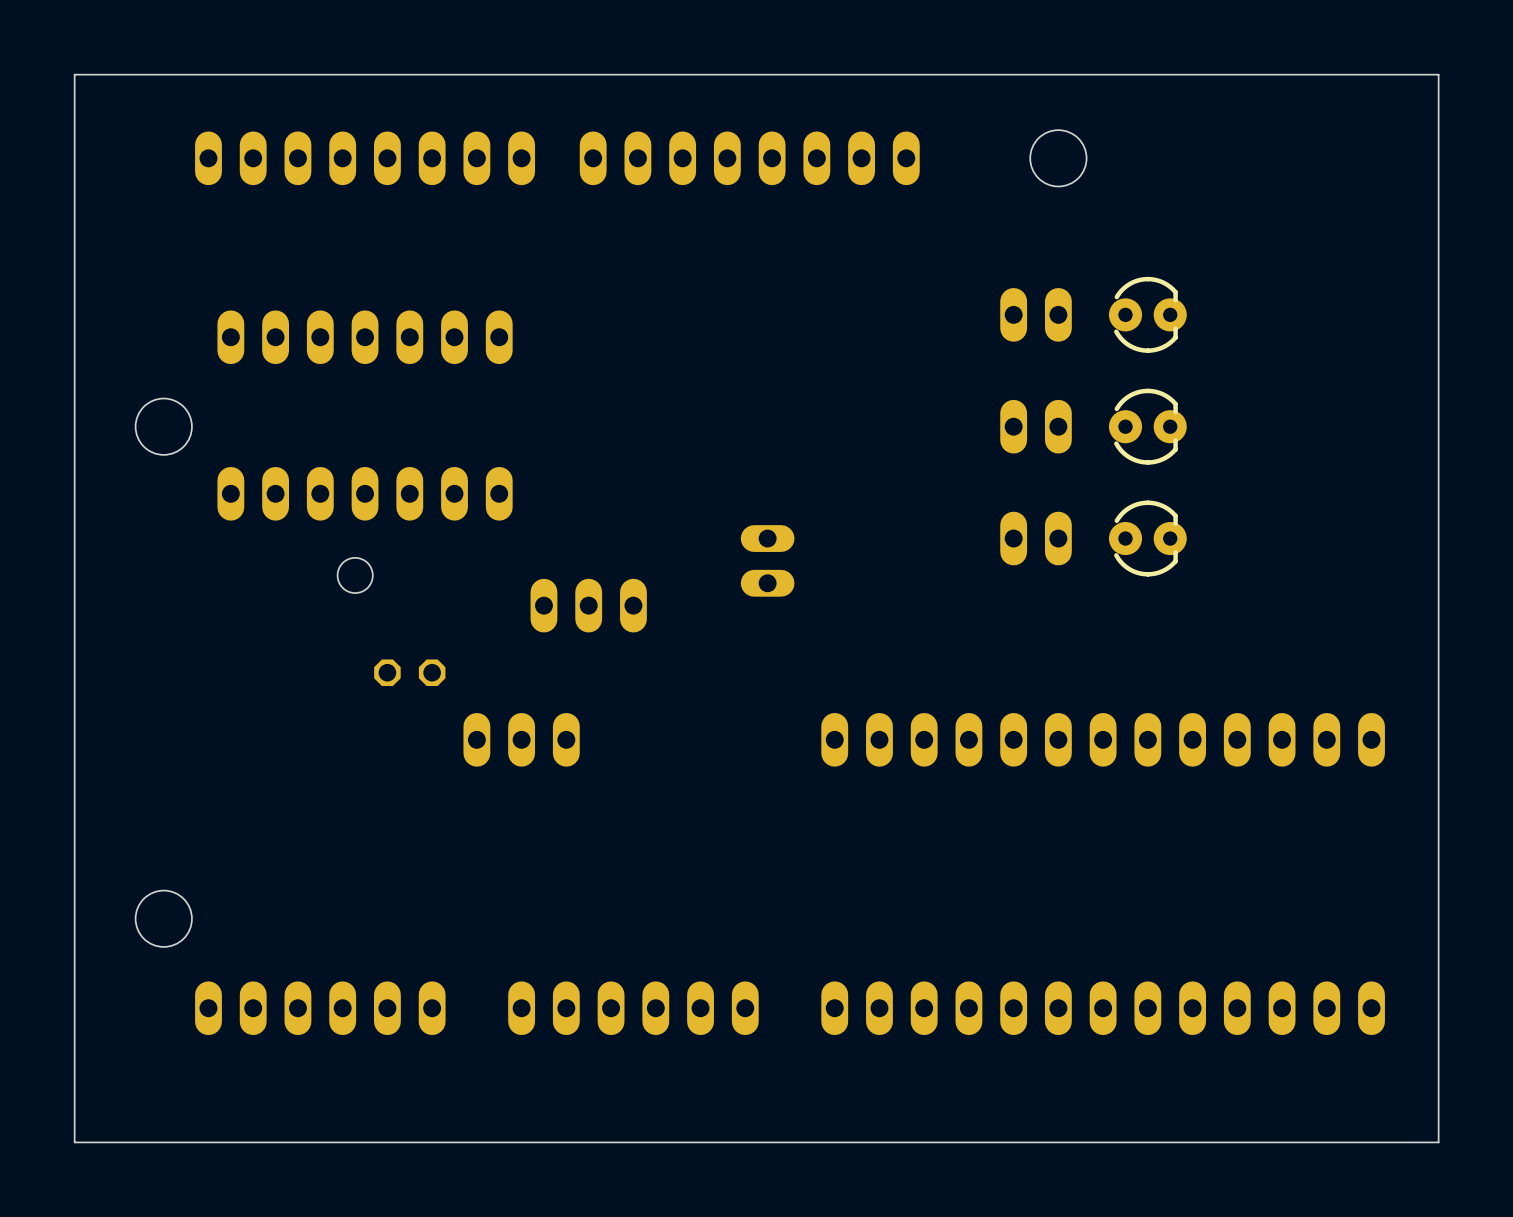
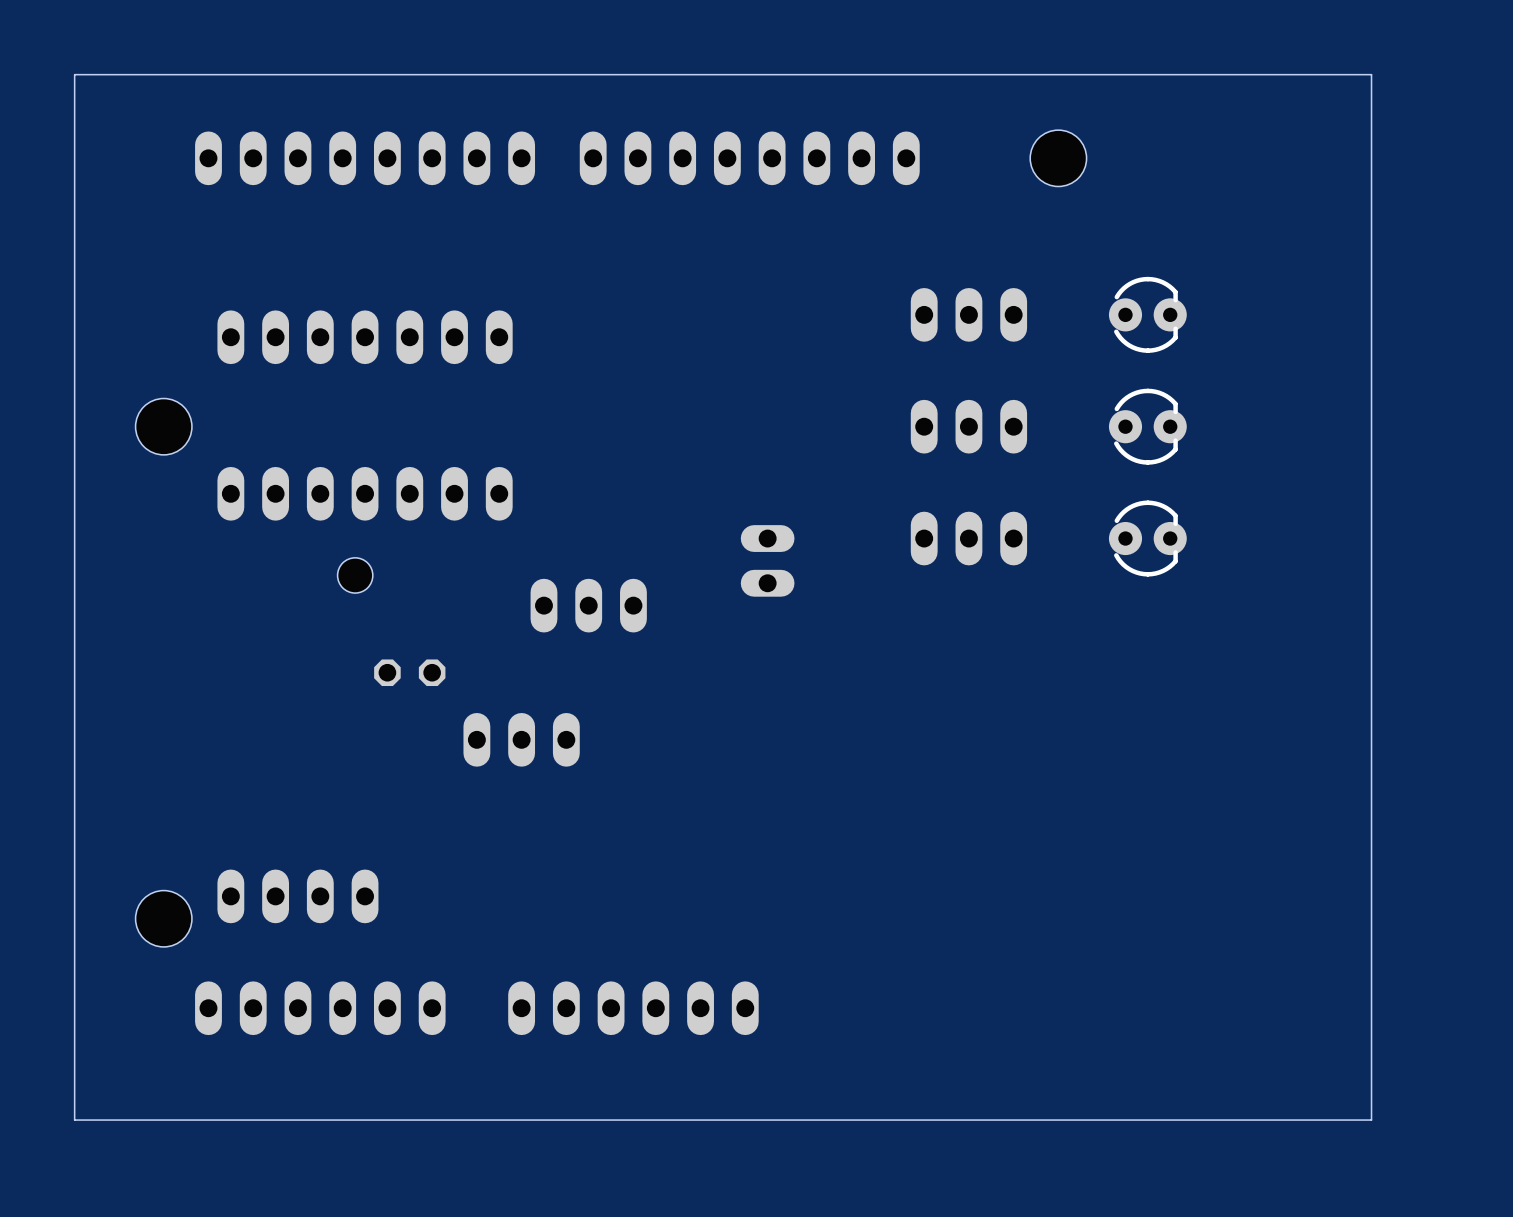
board edge: (1371, 74) (1438, 74) (1438, 1142) (74, 1142) (74, 1120) -> (1371, 74) (1371, 1120) (74, 1120)
part: none -> (968, 314)
part: (1036, 314) -> none
part: none -> (968, 426)
part: (1036, 426) -> none
part: none -> (968, 538)
part: (1036, 538) -> none
part: (1103, 739) -> none
part: none -> (297, 896)
part: (1103, 1008) -> none

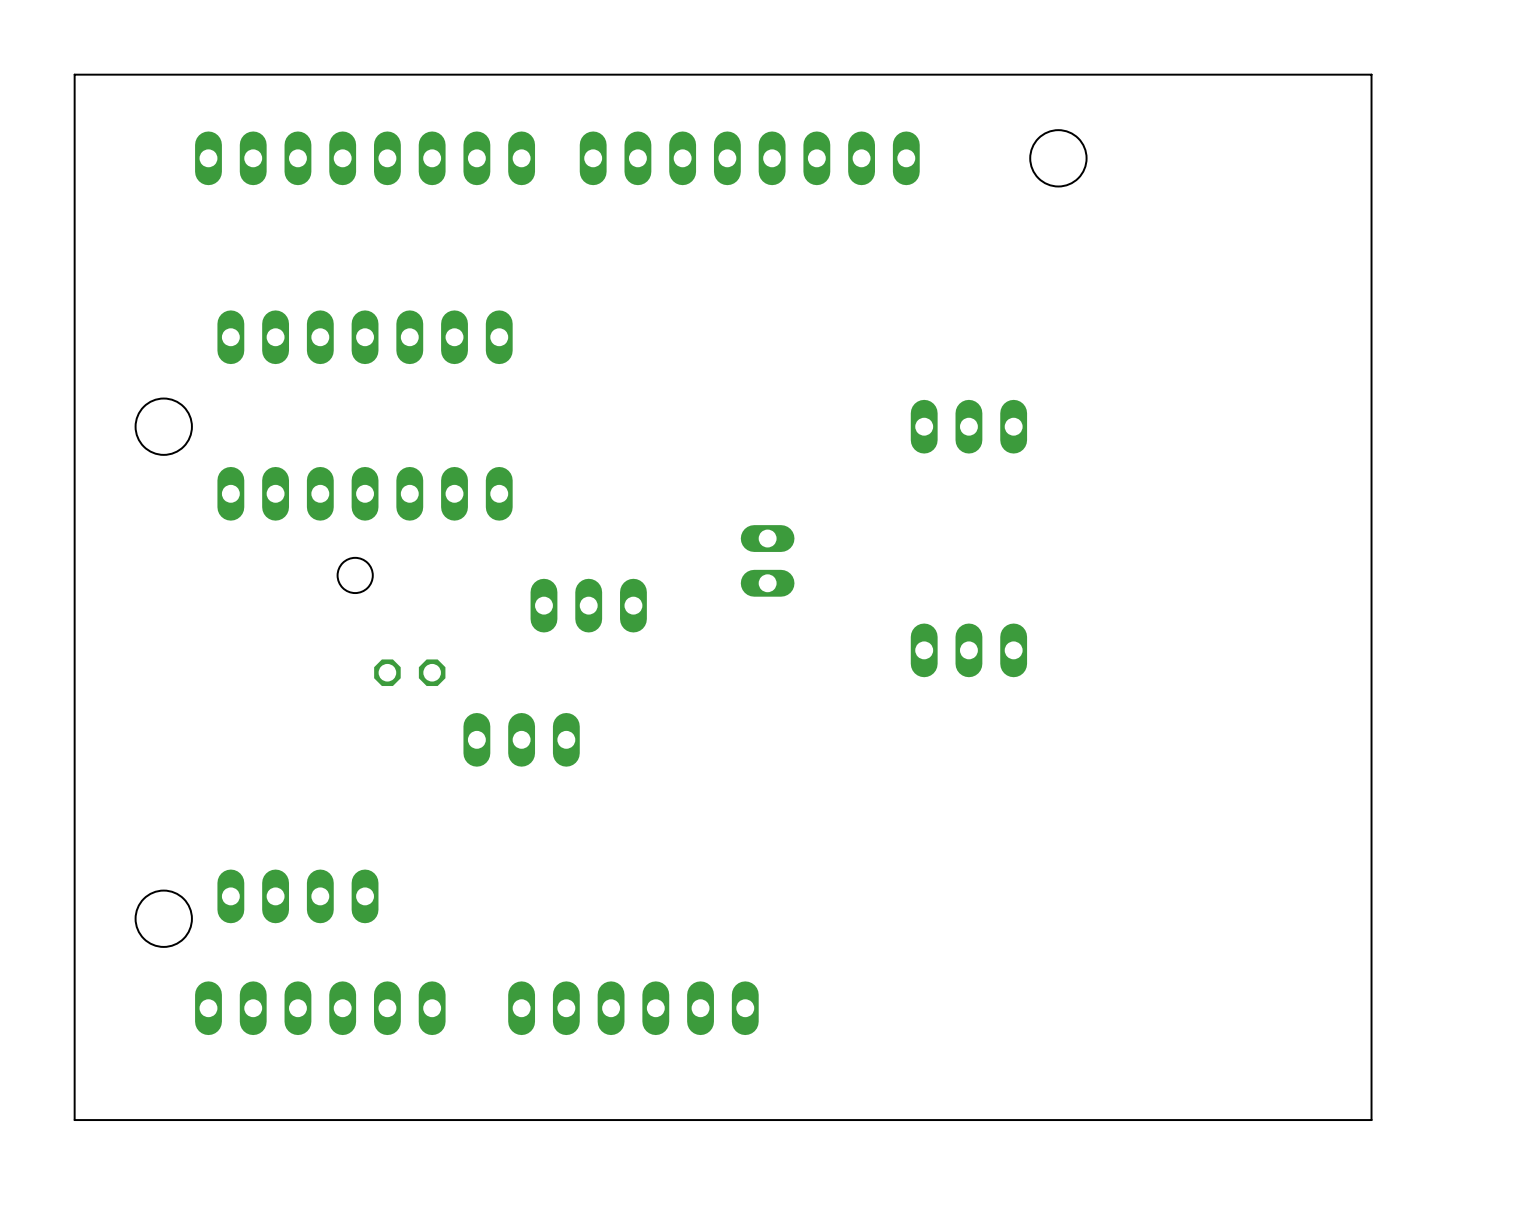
part: (968, 314) -> none
part: (1147, 314) -> none
part: (1147, 426) -> none
part position: (968, 538) -> (968, 650)
part: (1147, 538) -> none

